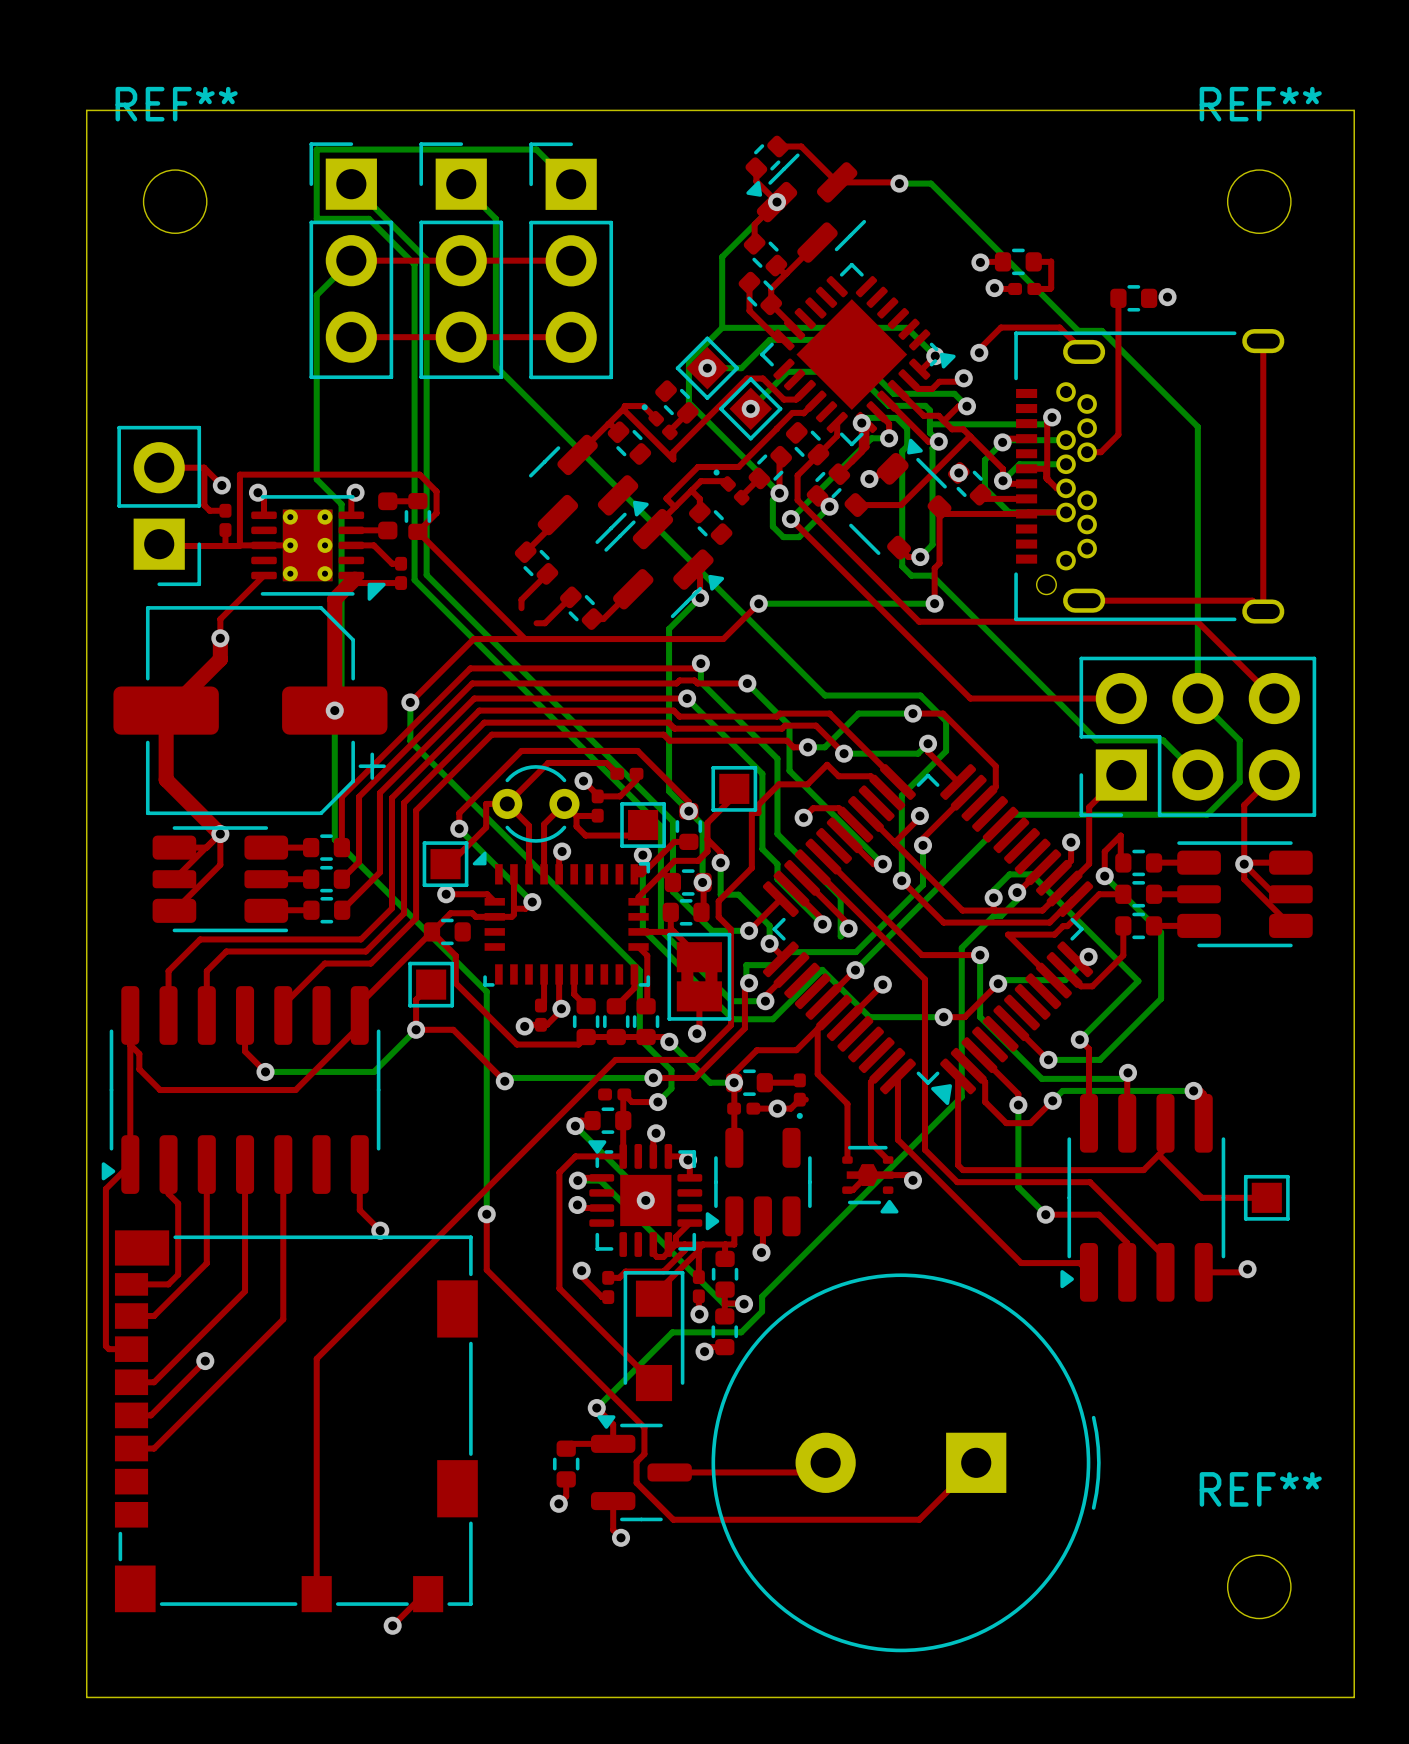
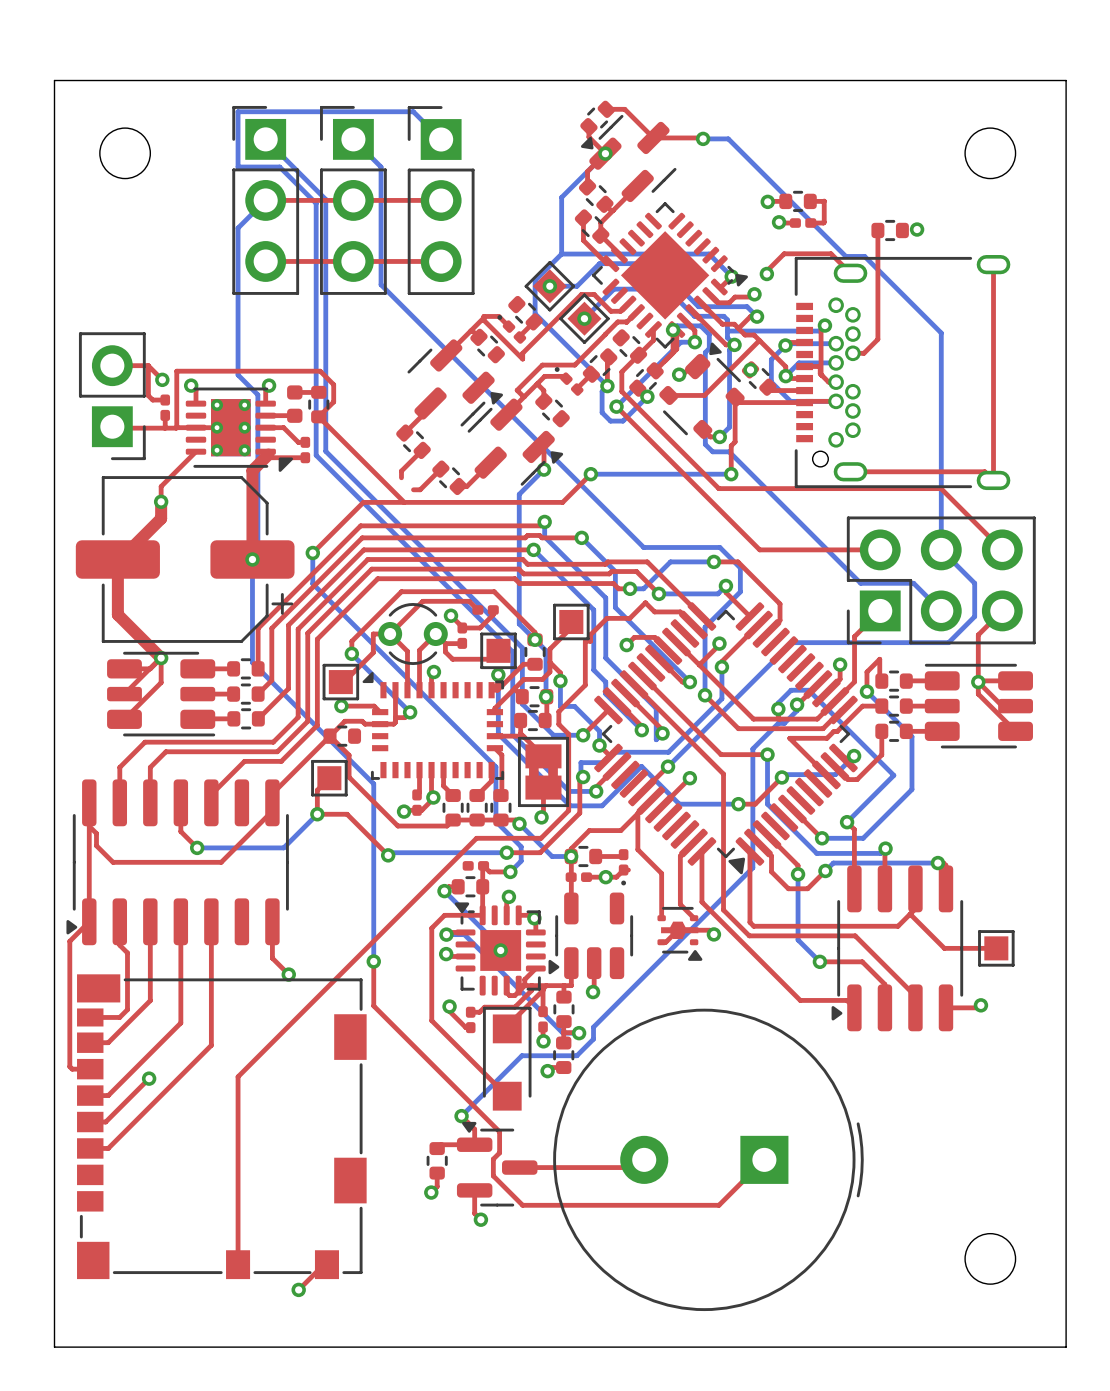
REF** name: REF** (176, 104) -> none
REF** name: REF** (1260, 104) -> none
REF** name: REF** (1260, 1489) -> none

